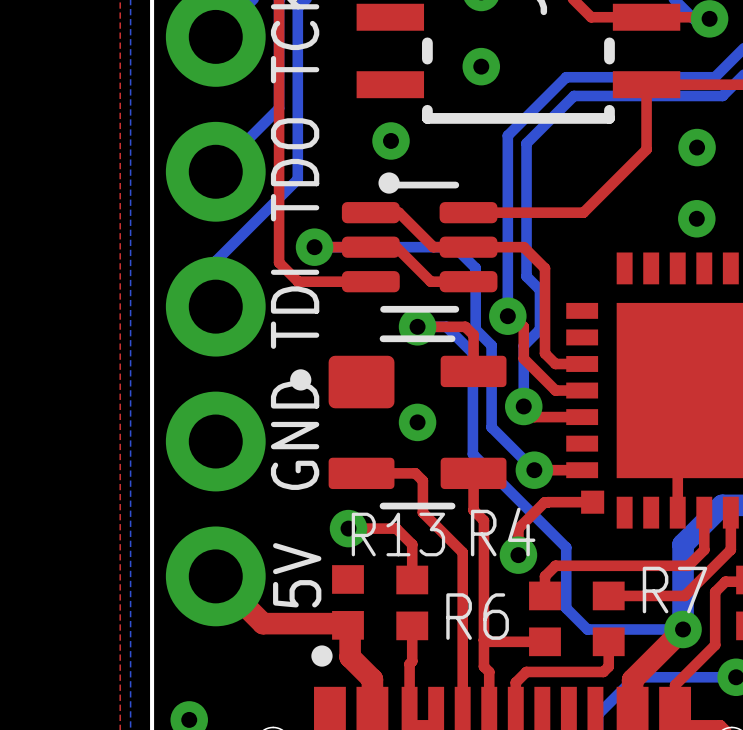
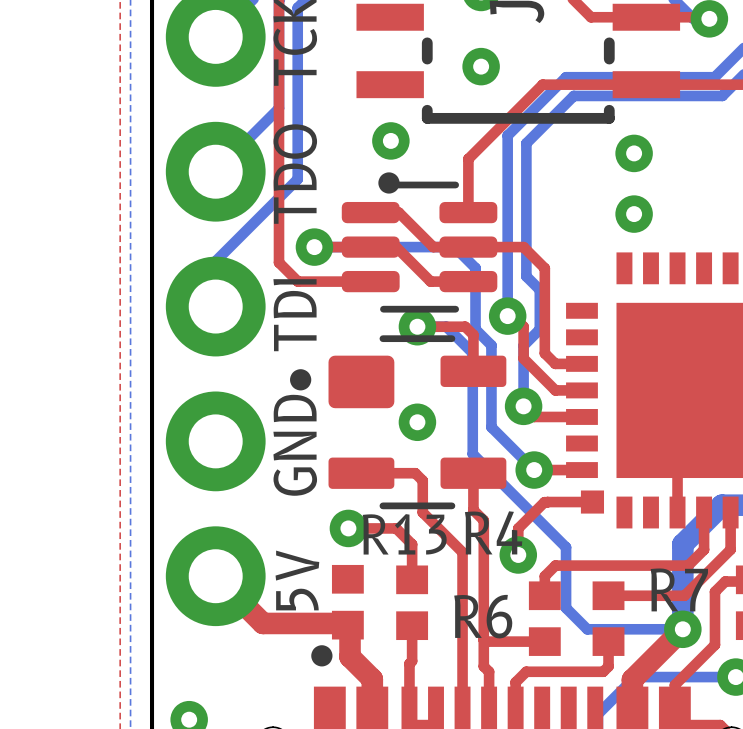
top track: (646, 84) (646, 149) (583, 212) (468, 212) -> (646, 84) (542, 84) (468, 158) (468, 212)
via: (697, 147) -> none
via: none -> (634, 153)
via: none -> (634, 214)
via: (696, 218) -> none

